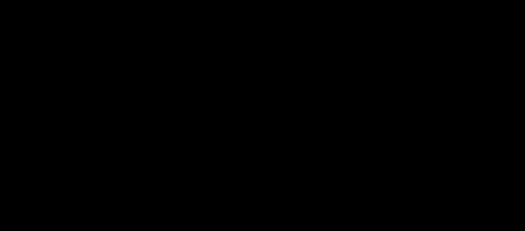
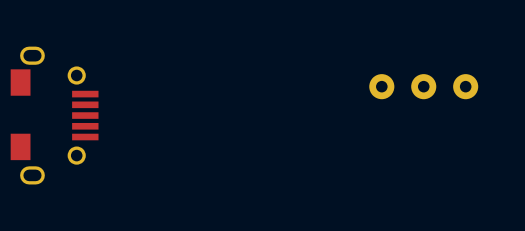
part: none -> (423, 86)
part: none -> (54, 115)

